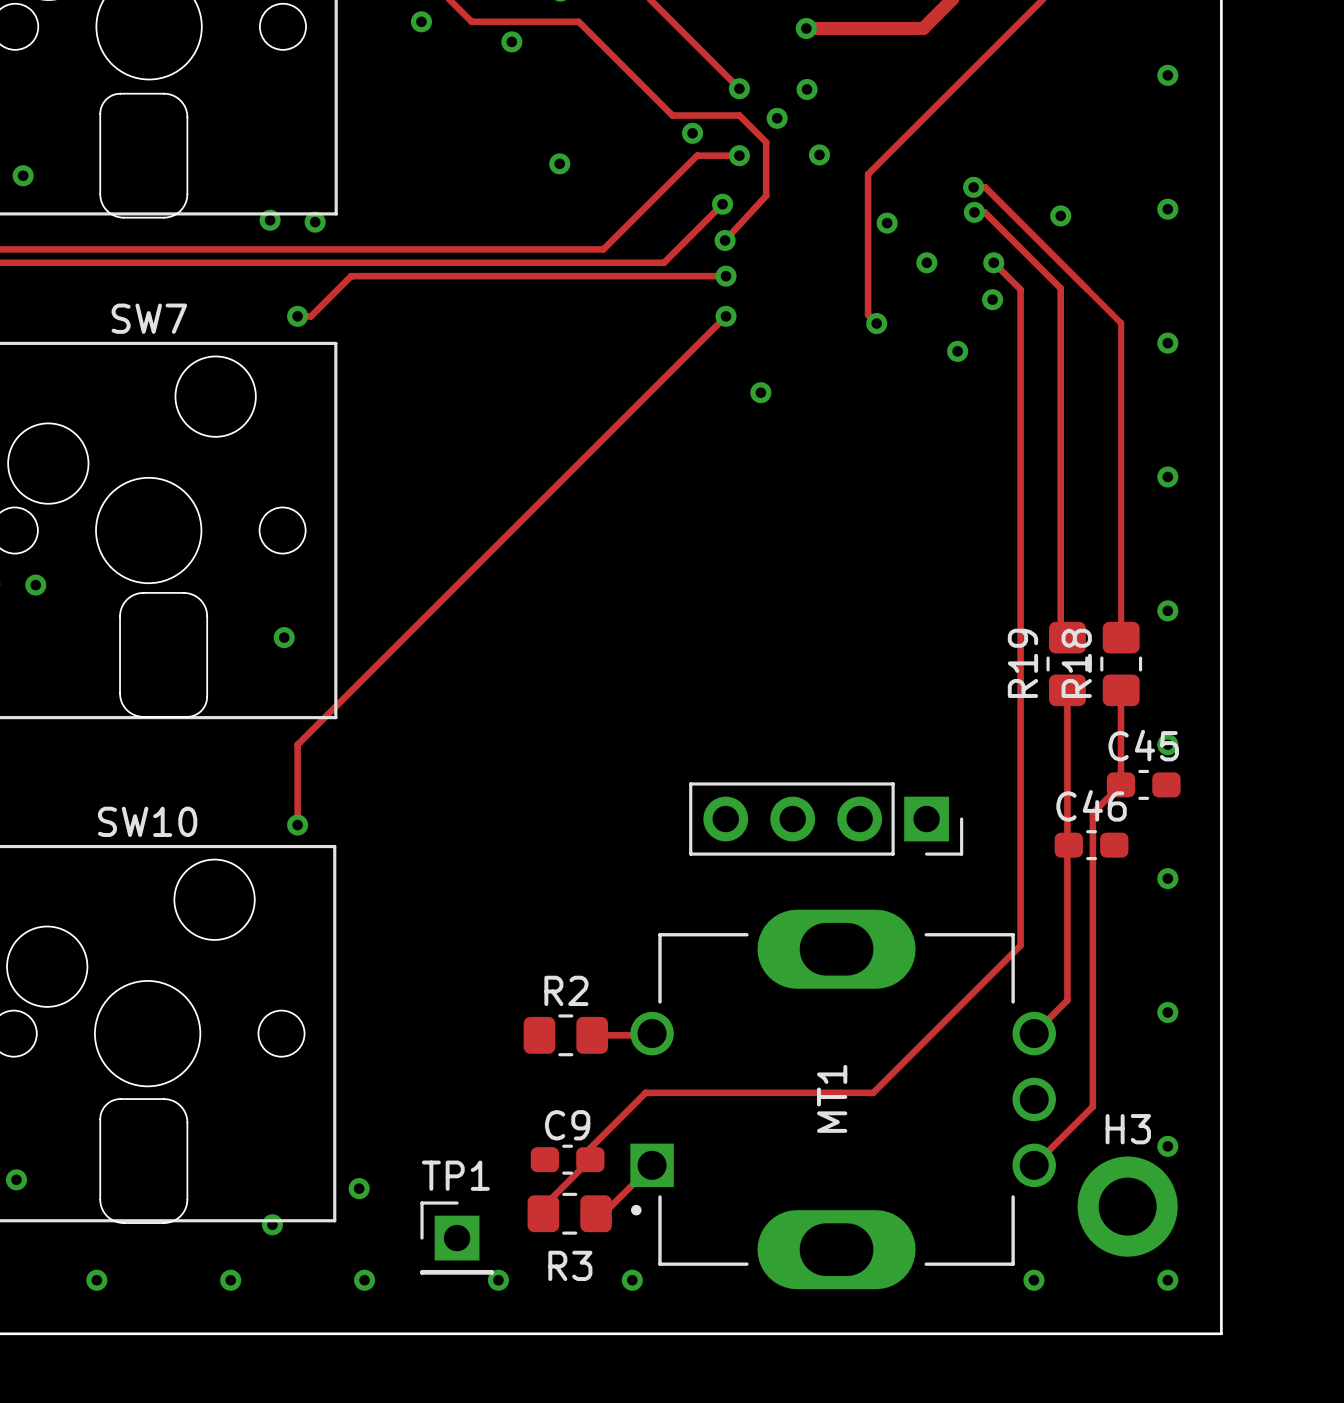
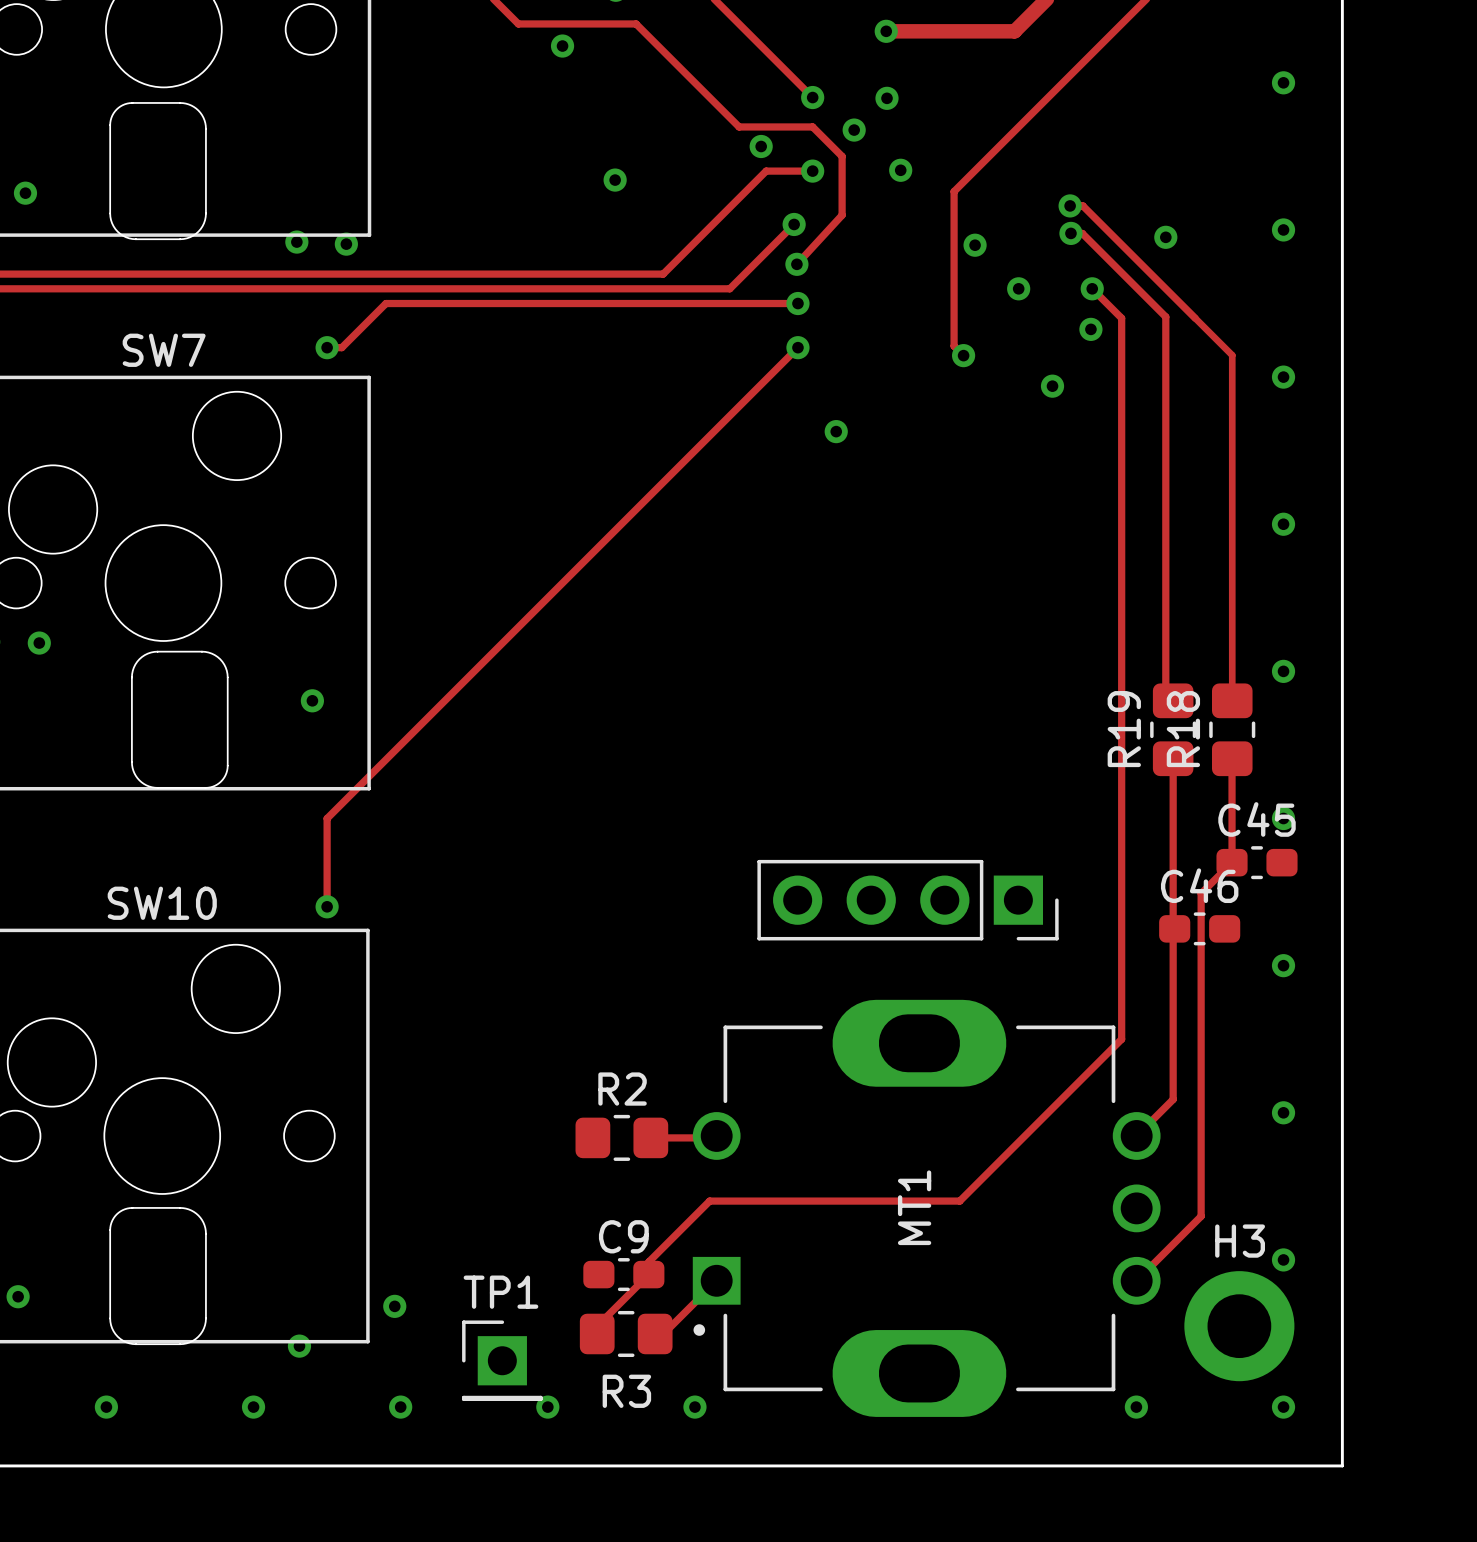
via: (421, 21) -> none

